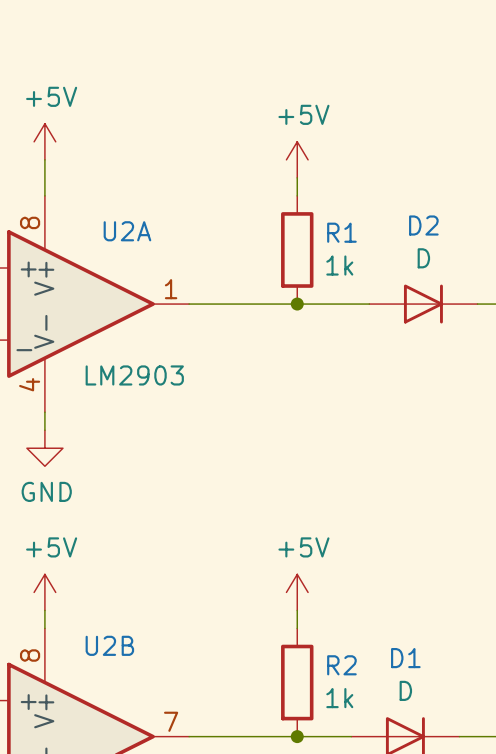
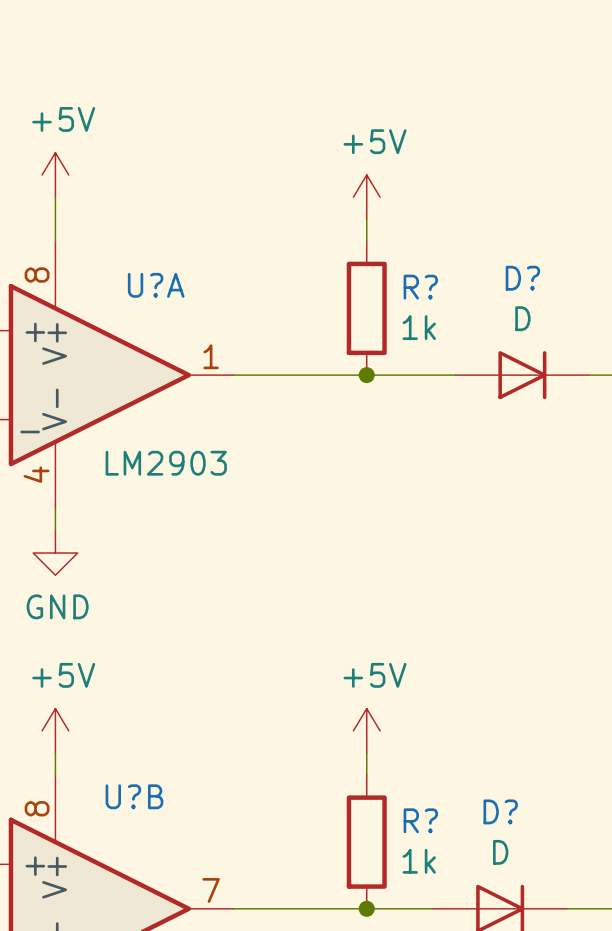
D2 name: D2 (423, 225) -> D? (522, 278)
U2A name: U2A (127, 231) -> U?A (156, 285)
R1 name: R1 (341, 232) -> R? (420, 287)
U2B name: U2B (109, 645) -> U?B (134, 796)
D1 name: D1 (405, 658) -> D? (500, 811)
R2 name: R2 (341, 665) -> R? (420, 820)

